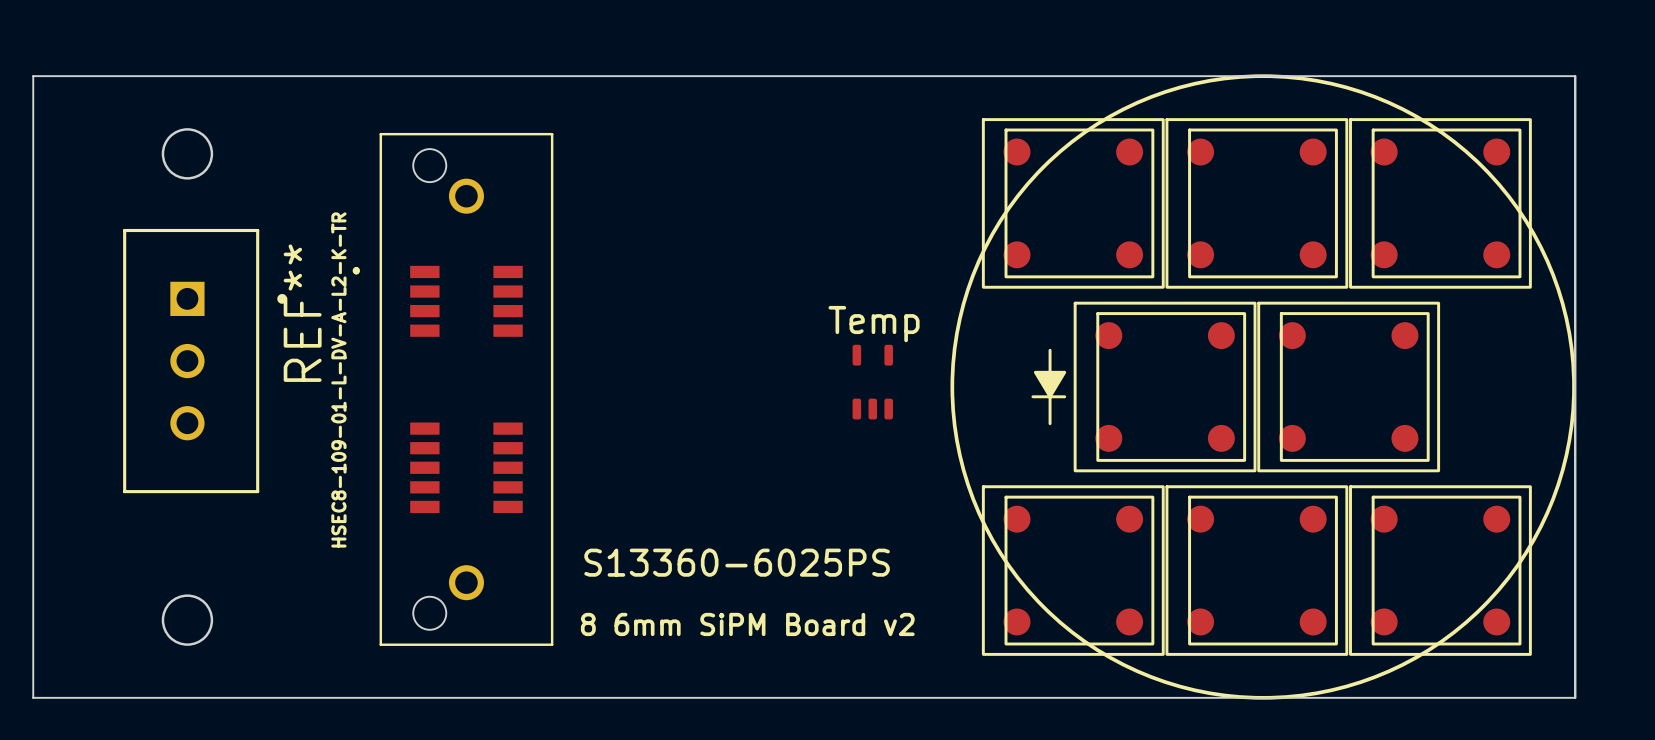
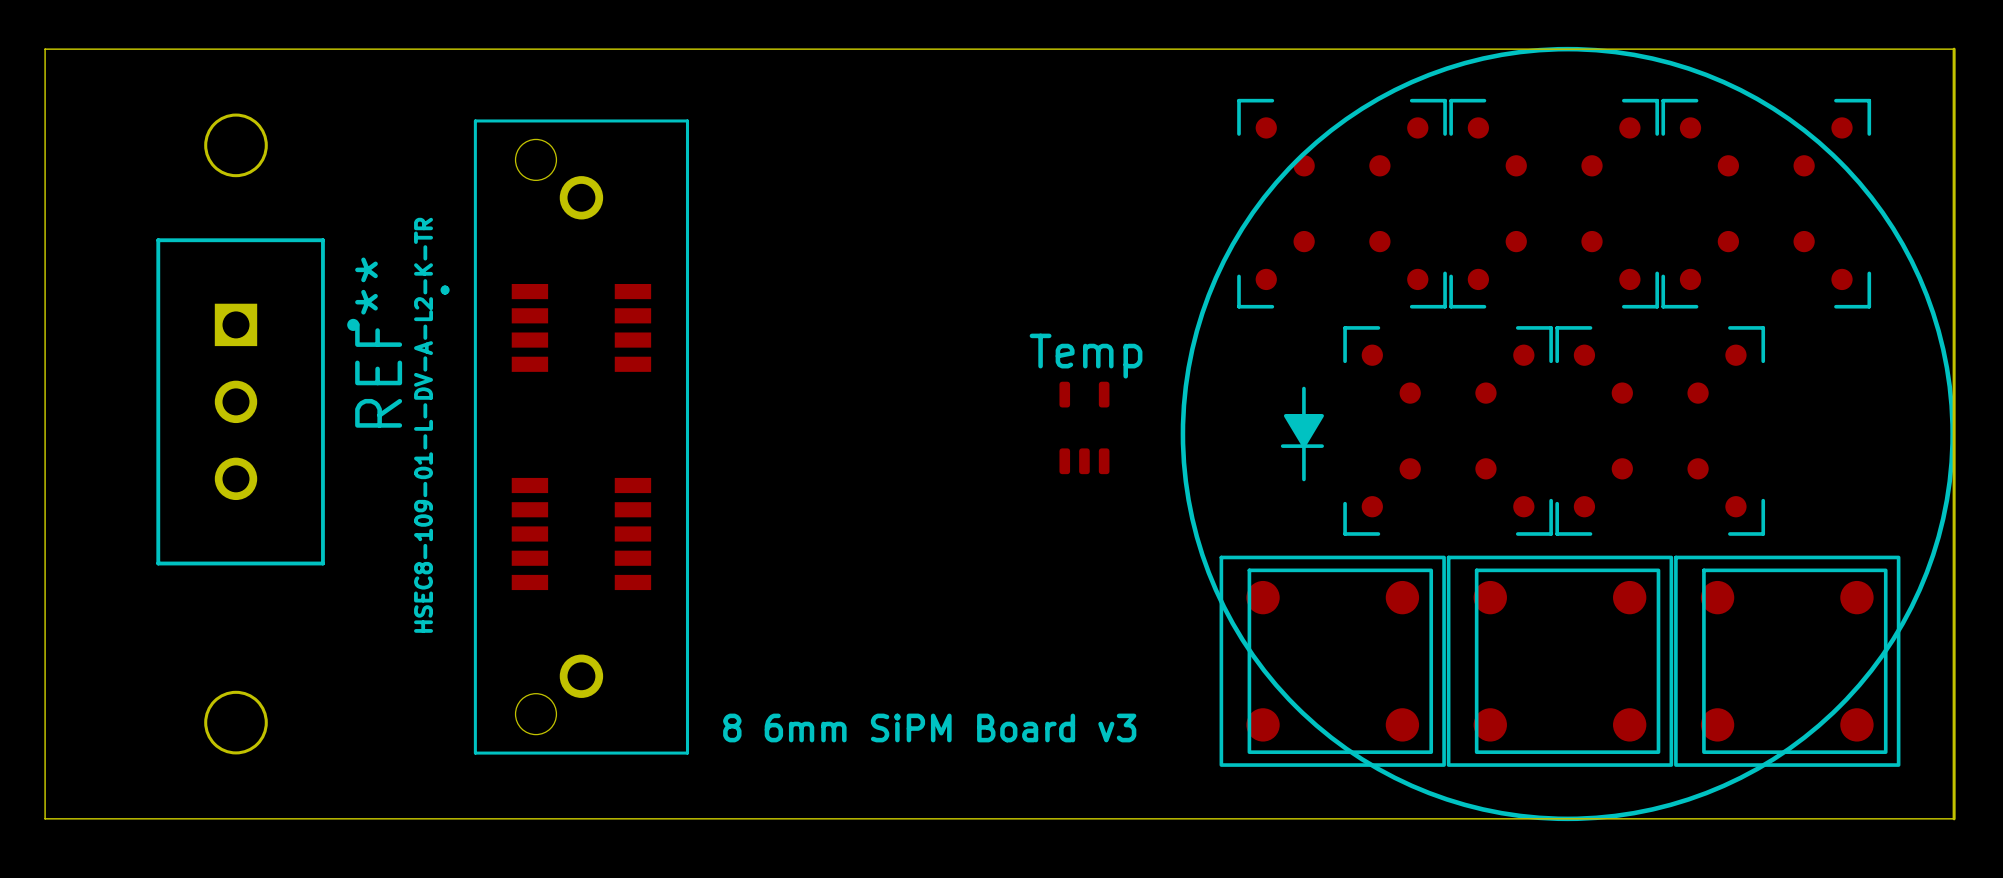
part footprint: [981, 118, 1165, 289] -> [1237, 98, 1447, 309]
part footprint: [1165, 118, 1349, 289] -> [1449, 98, 1659, 309]
part footprint: [1349, 118, 1532, 289] -> [1661, 98, 1872, 309]
part footprint: [1073, 301, 1257, 473] -> [1343, 326, 1553, 536]
part footprint: [1257, 301, 1441, 473] -> [1555, 326, 1766, 536]
text: S13360-6025PS (737, 562) -> none
text: 8 6mm SiPM Board v2 (747, 624) -> 8 6mm SiPM Board v3 (929, 727)

